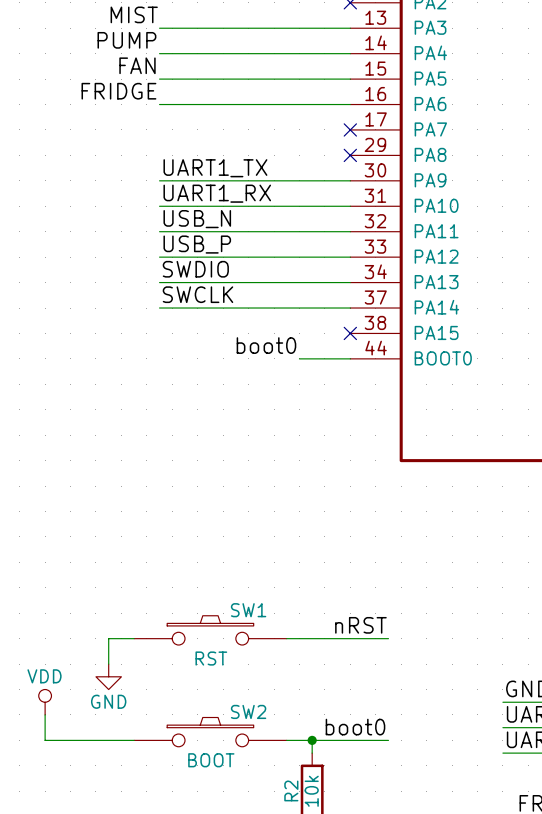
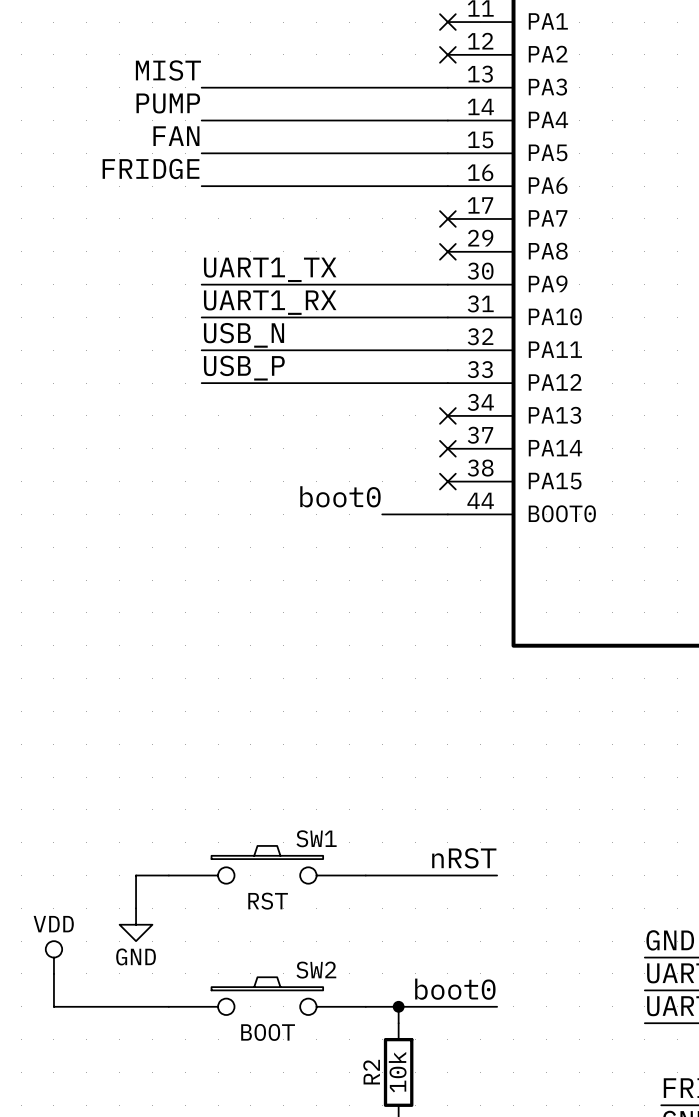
label: SWDIO (195, 269) -> none
wire: (159, 282) (350, 282) -> none
no-connect mark: none -> (447, 415)
label: SWCLK (197, 294) -> none
wire: (159, 308) (350, 308) -> none
no-connect mark: none -> (447, 448)

